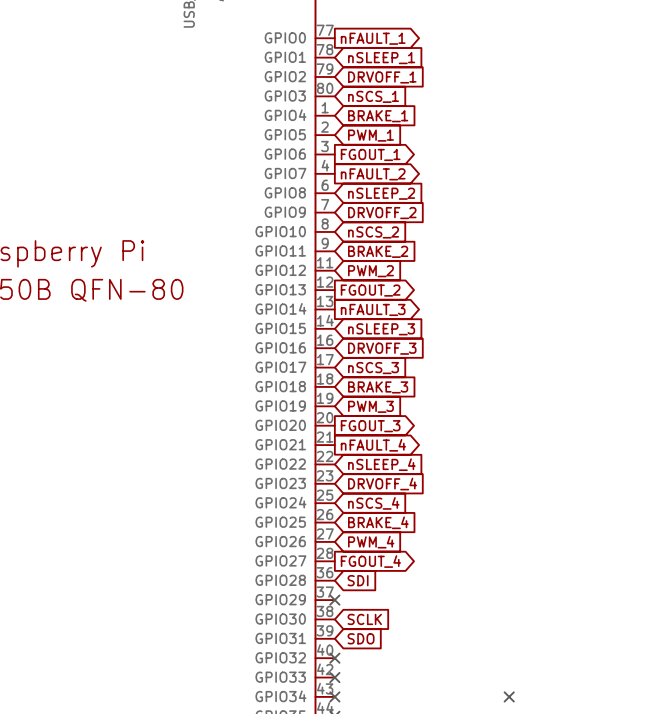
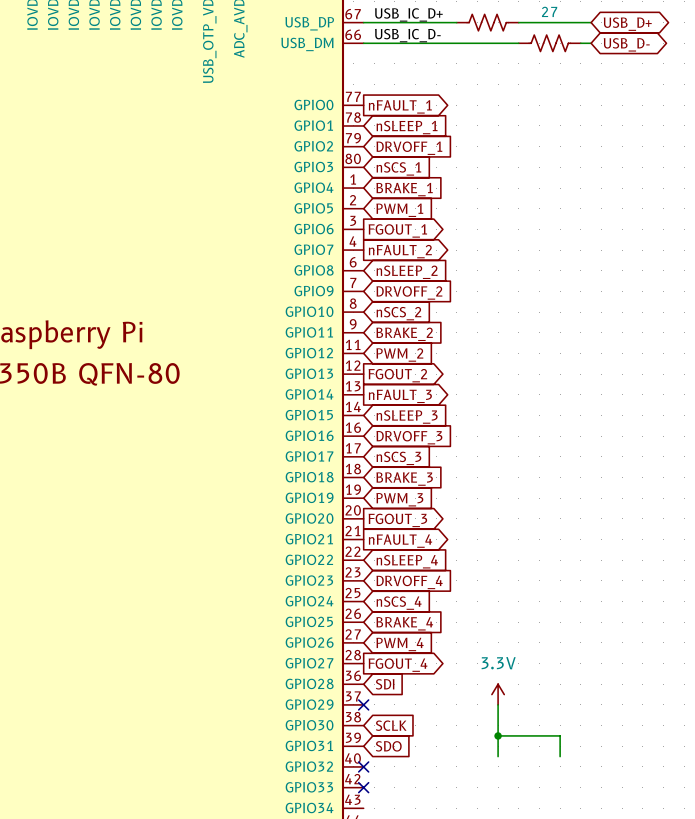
power symbol: none -> 3.3V (498, 694)
wire: none -> (498, 704) (498, 756)
wire: none -> (498, 735) (560, 735) (560, 756)
junction: none -> (498, 735)
no-connect mark: (334, 696) -> none
no-connect mark: (509, 696) -> none

